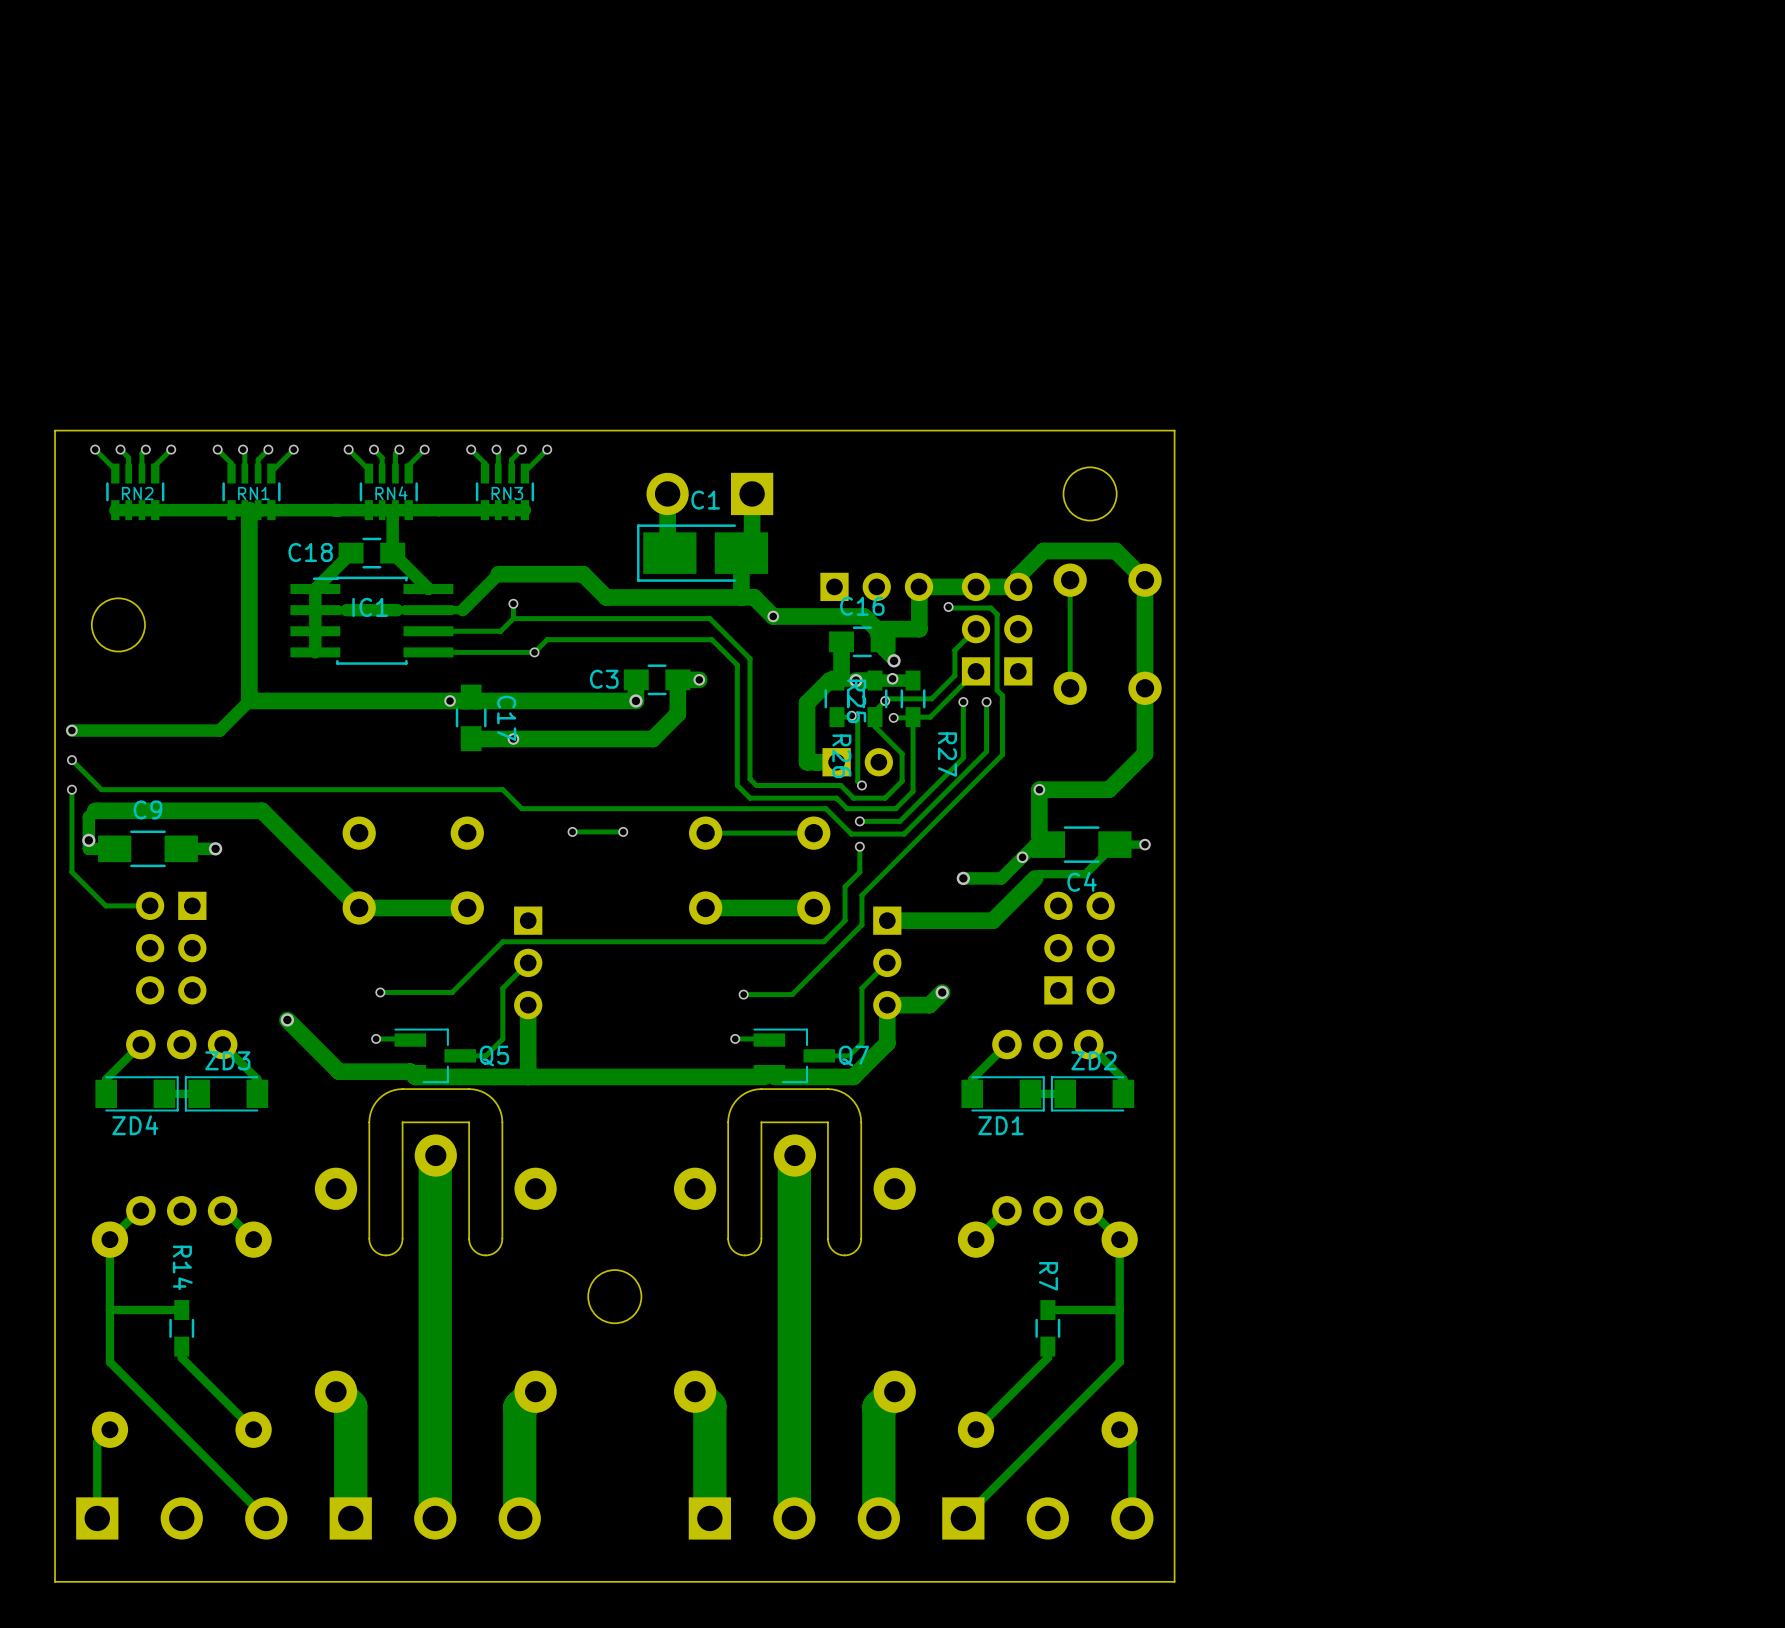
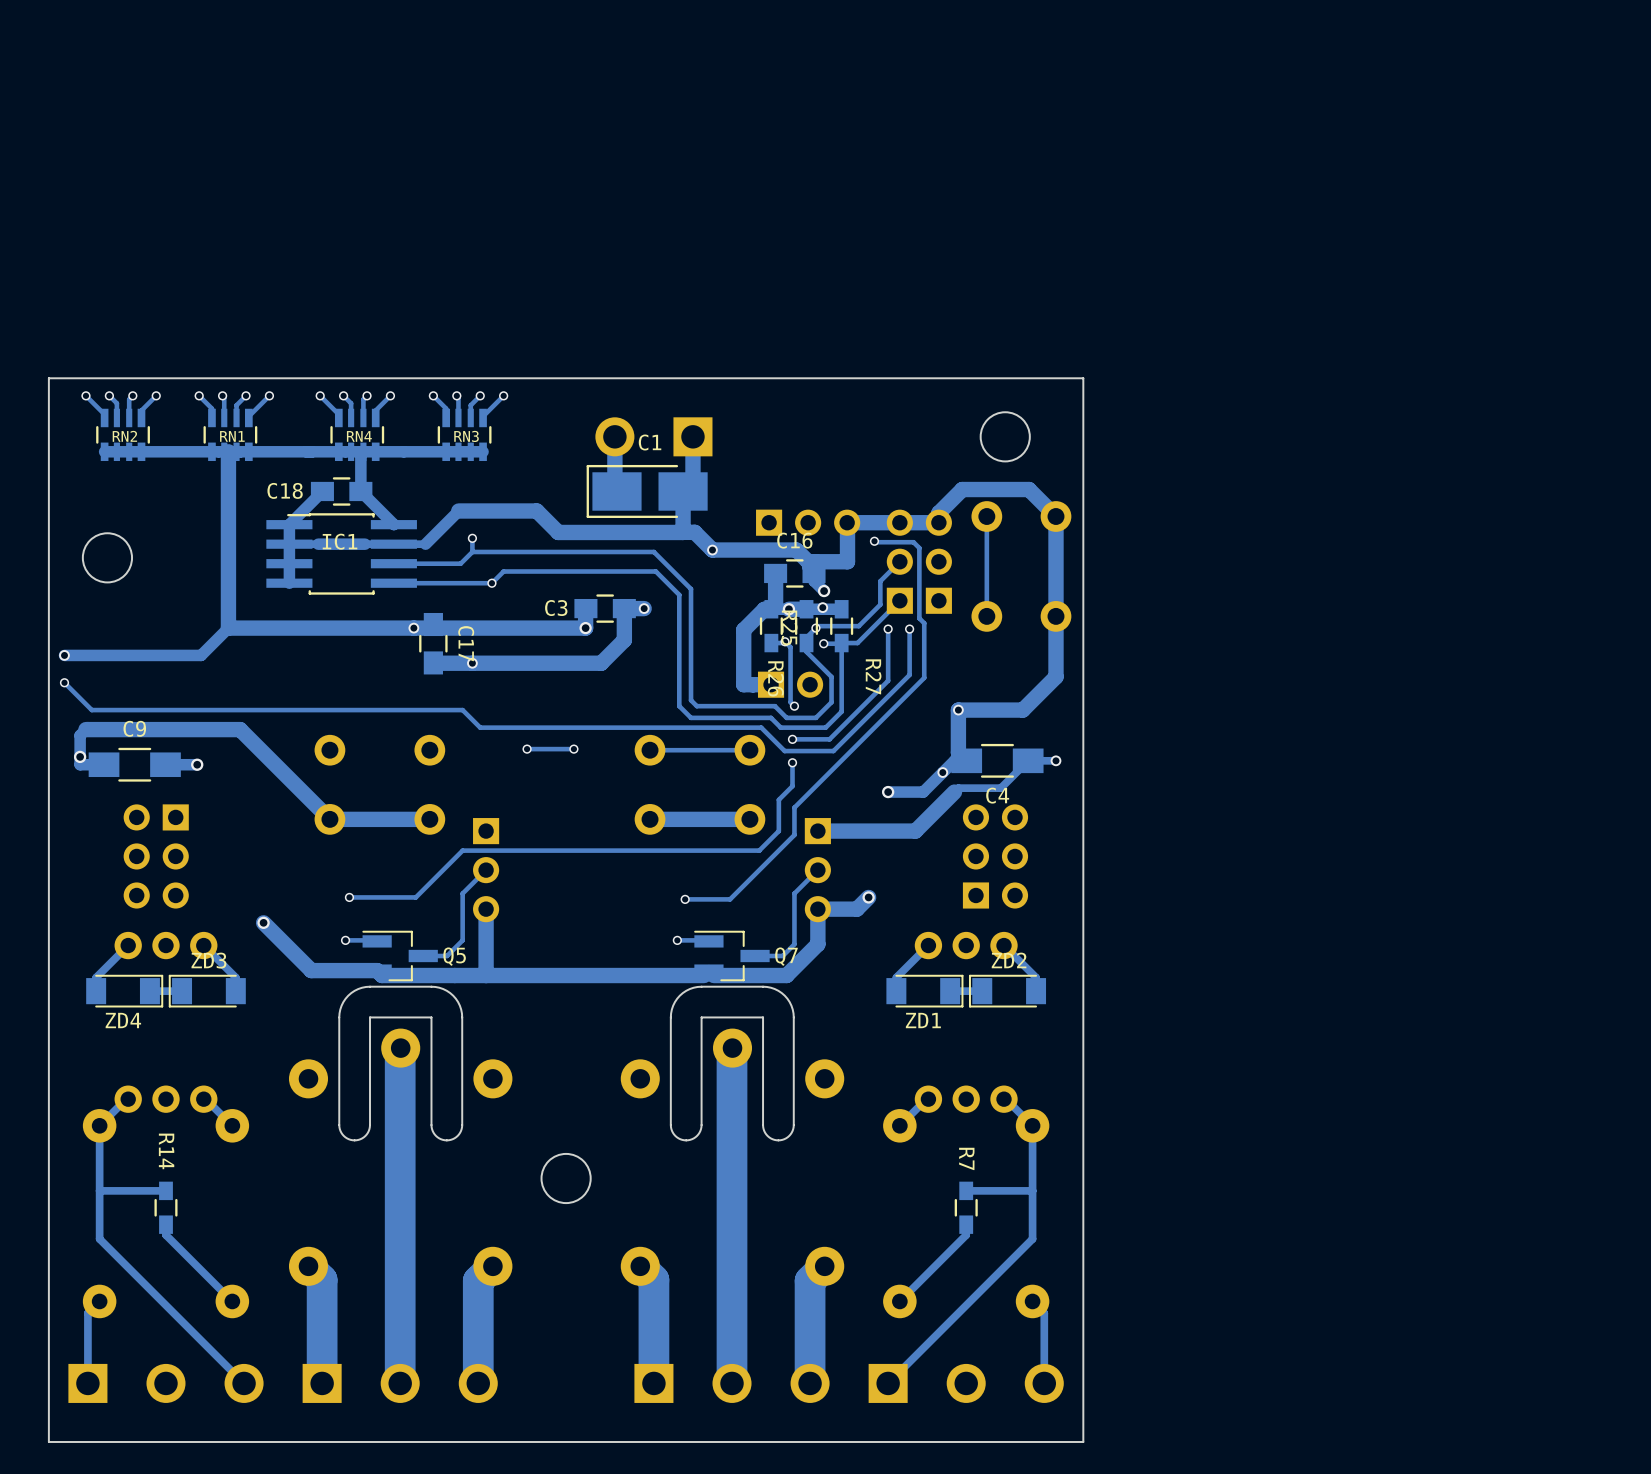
track: (71, 789) (71, 872) (105, 905) (150, 905) -> none
via: (71, 789) -> none

